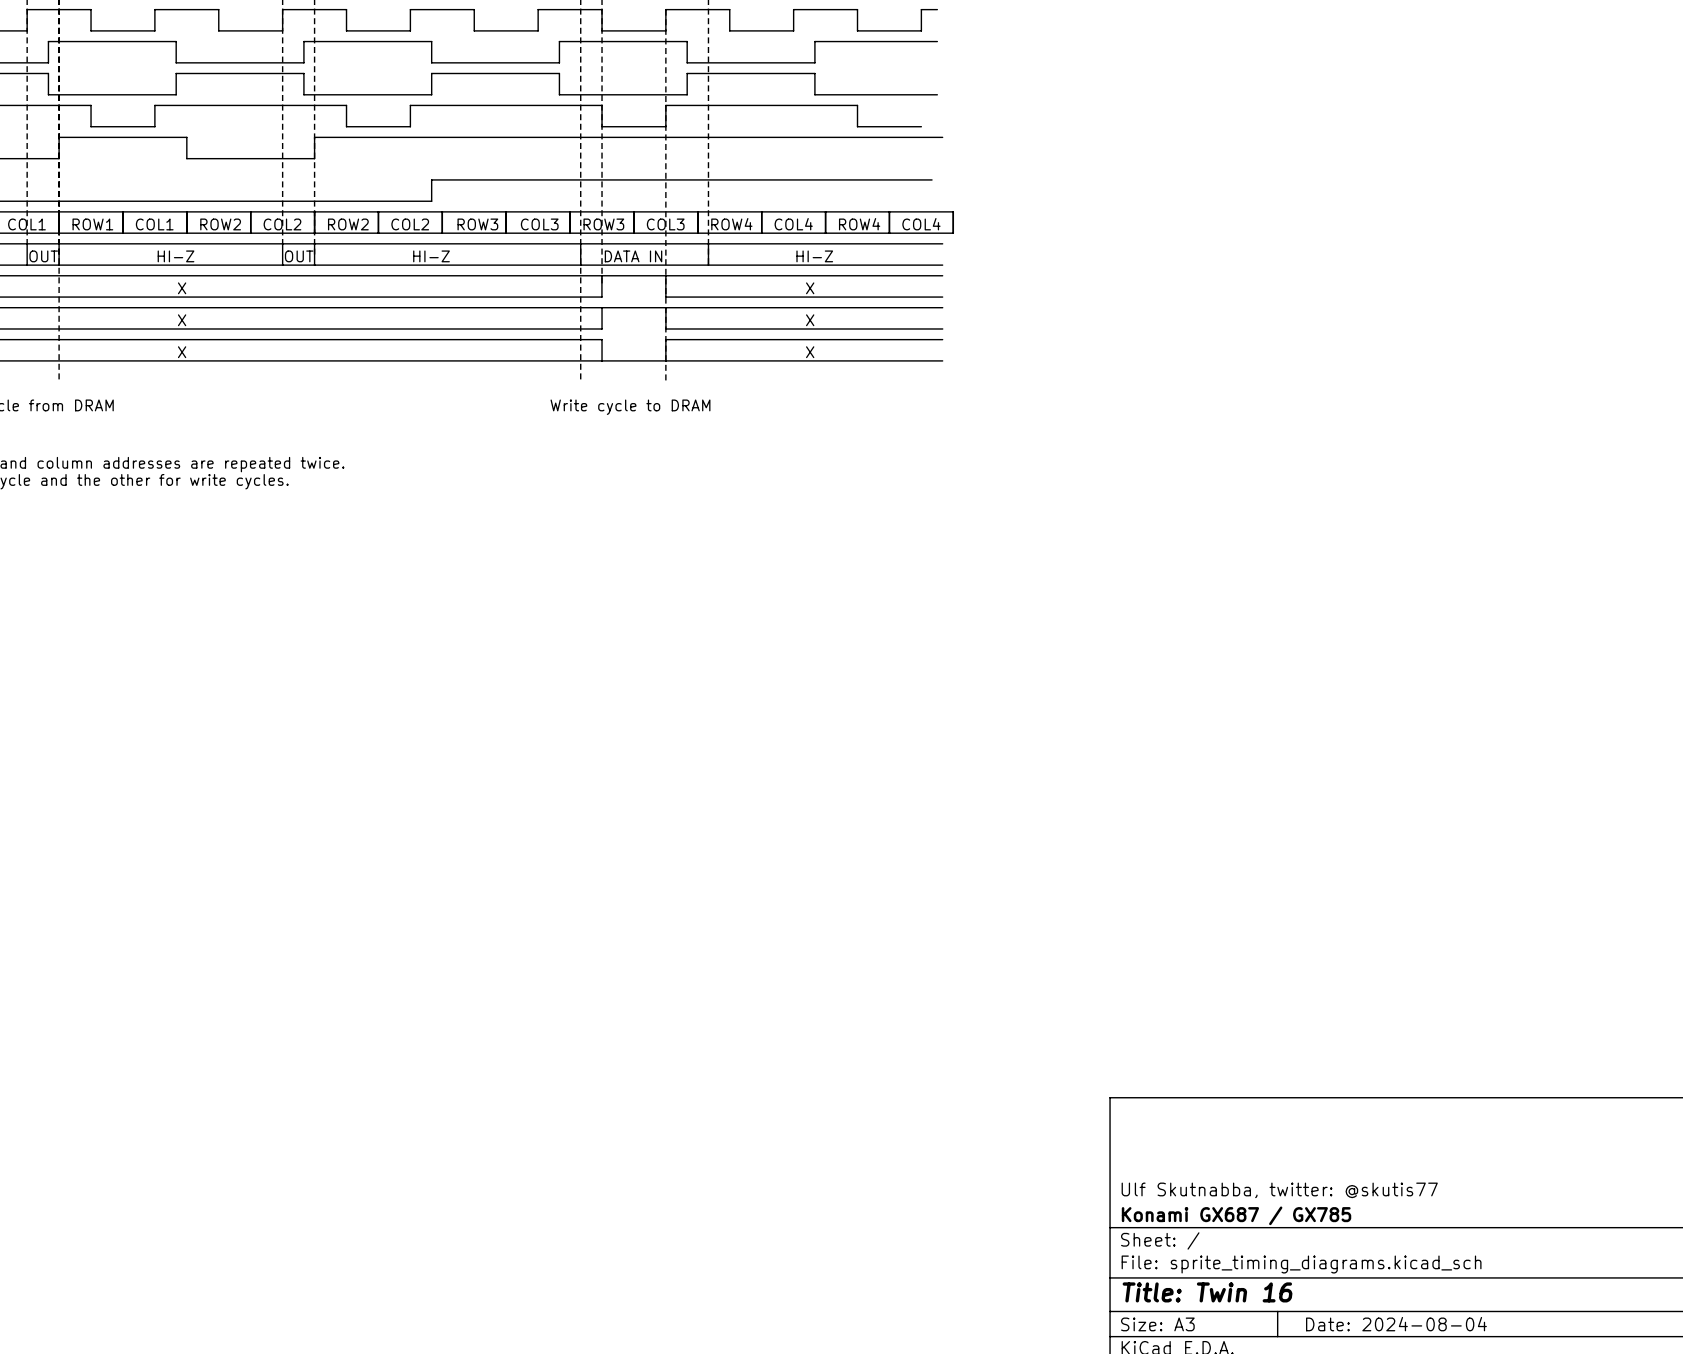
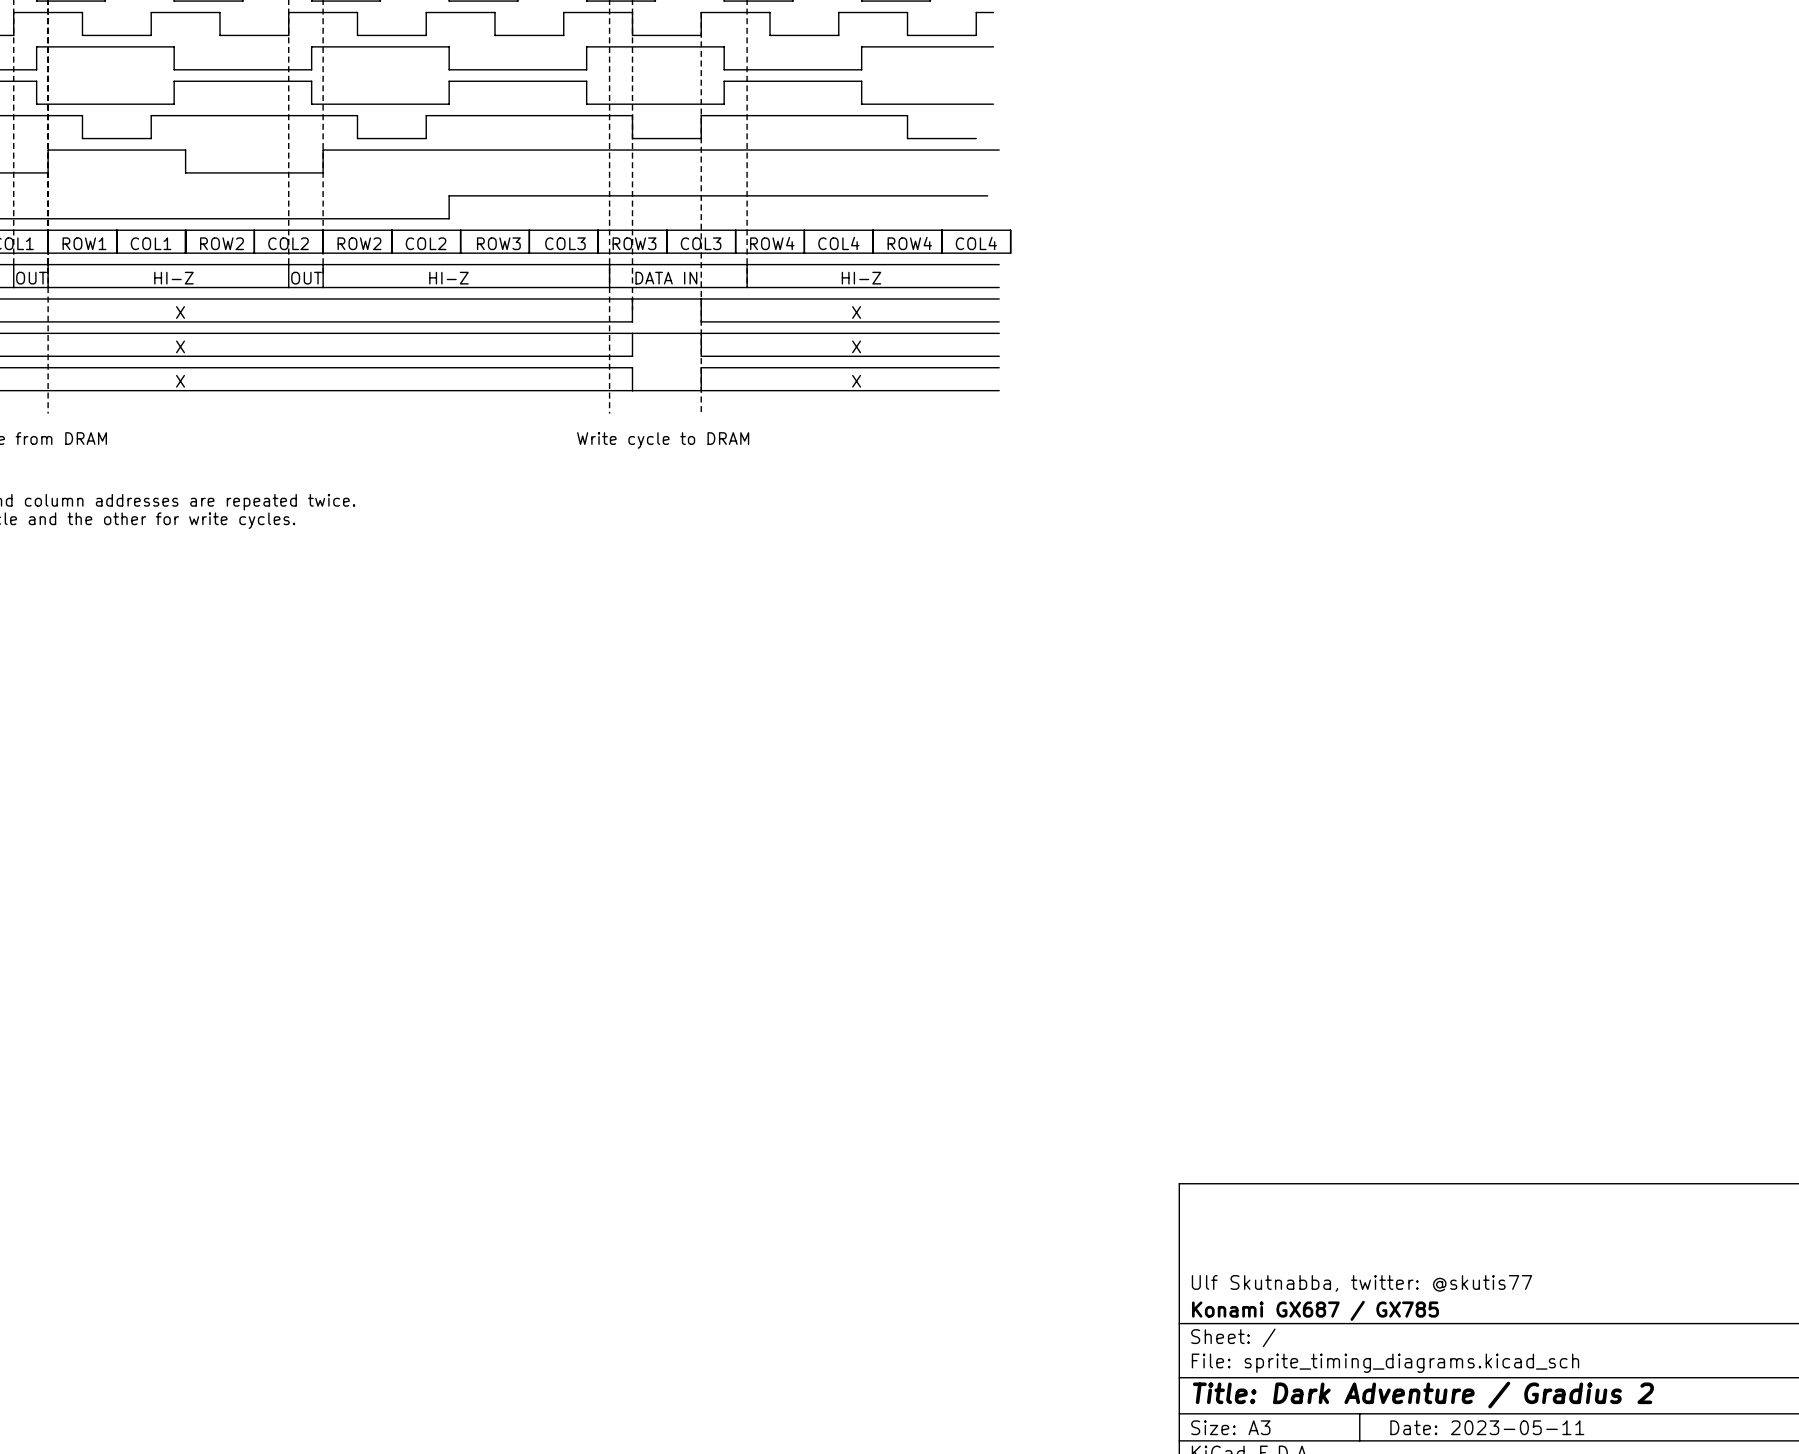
title block: Title: Twin 16 (1207, 1292) -> Title: Dark Adventure / Gradius 2 (1423, 1395)
title block: Date: 2024-08-04 (1396, 1324) -> Date: 2023-05-11 (1487, 1427)

